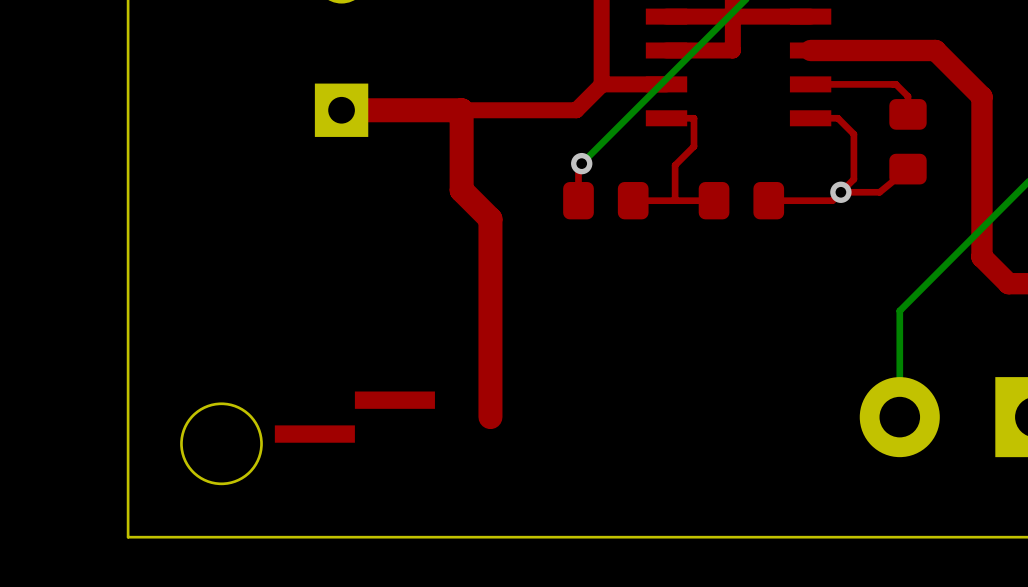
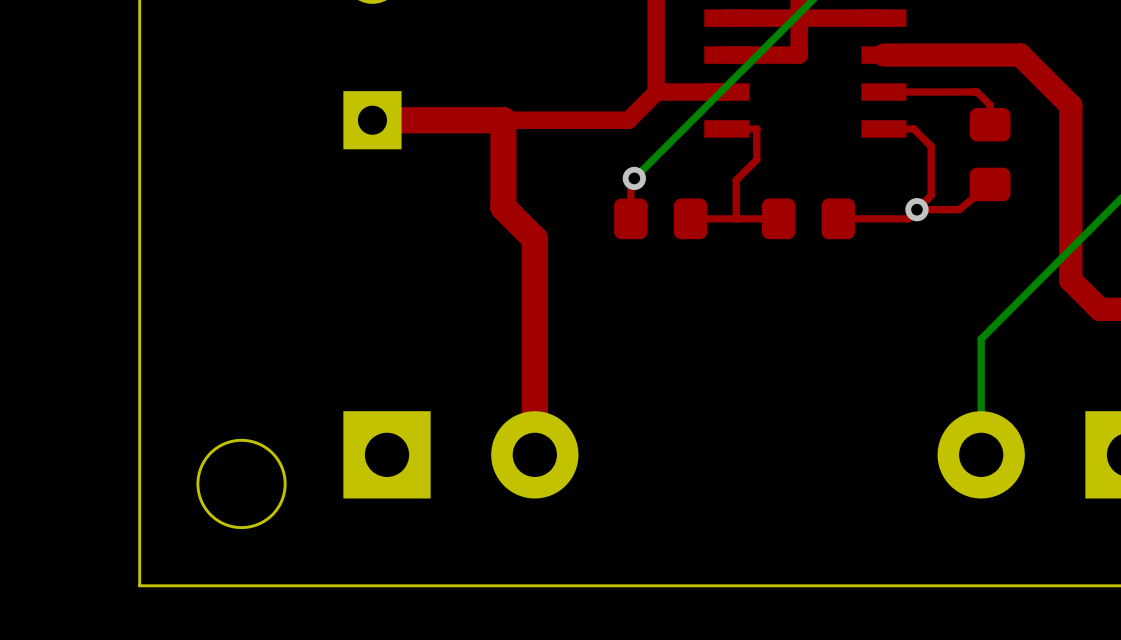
part: (354, 417) -> none
part: none -> (460, 454)

